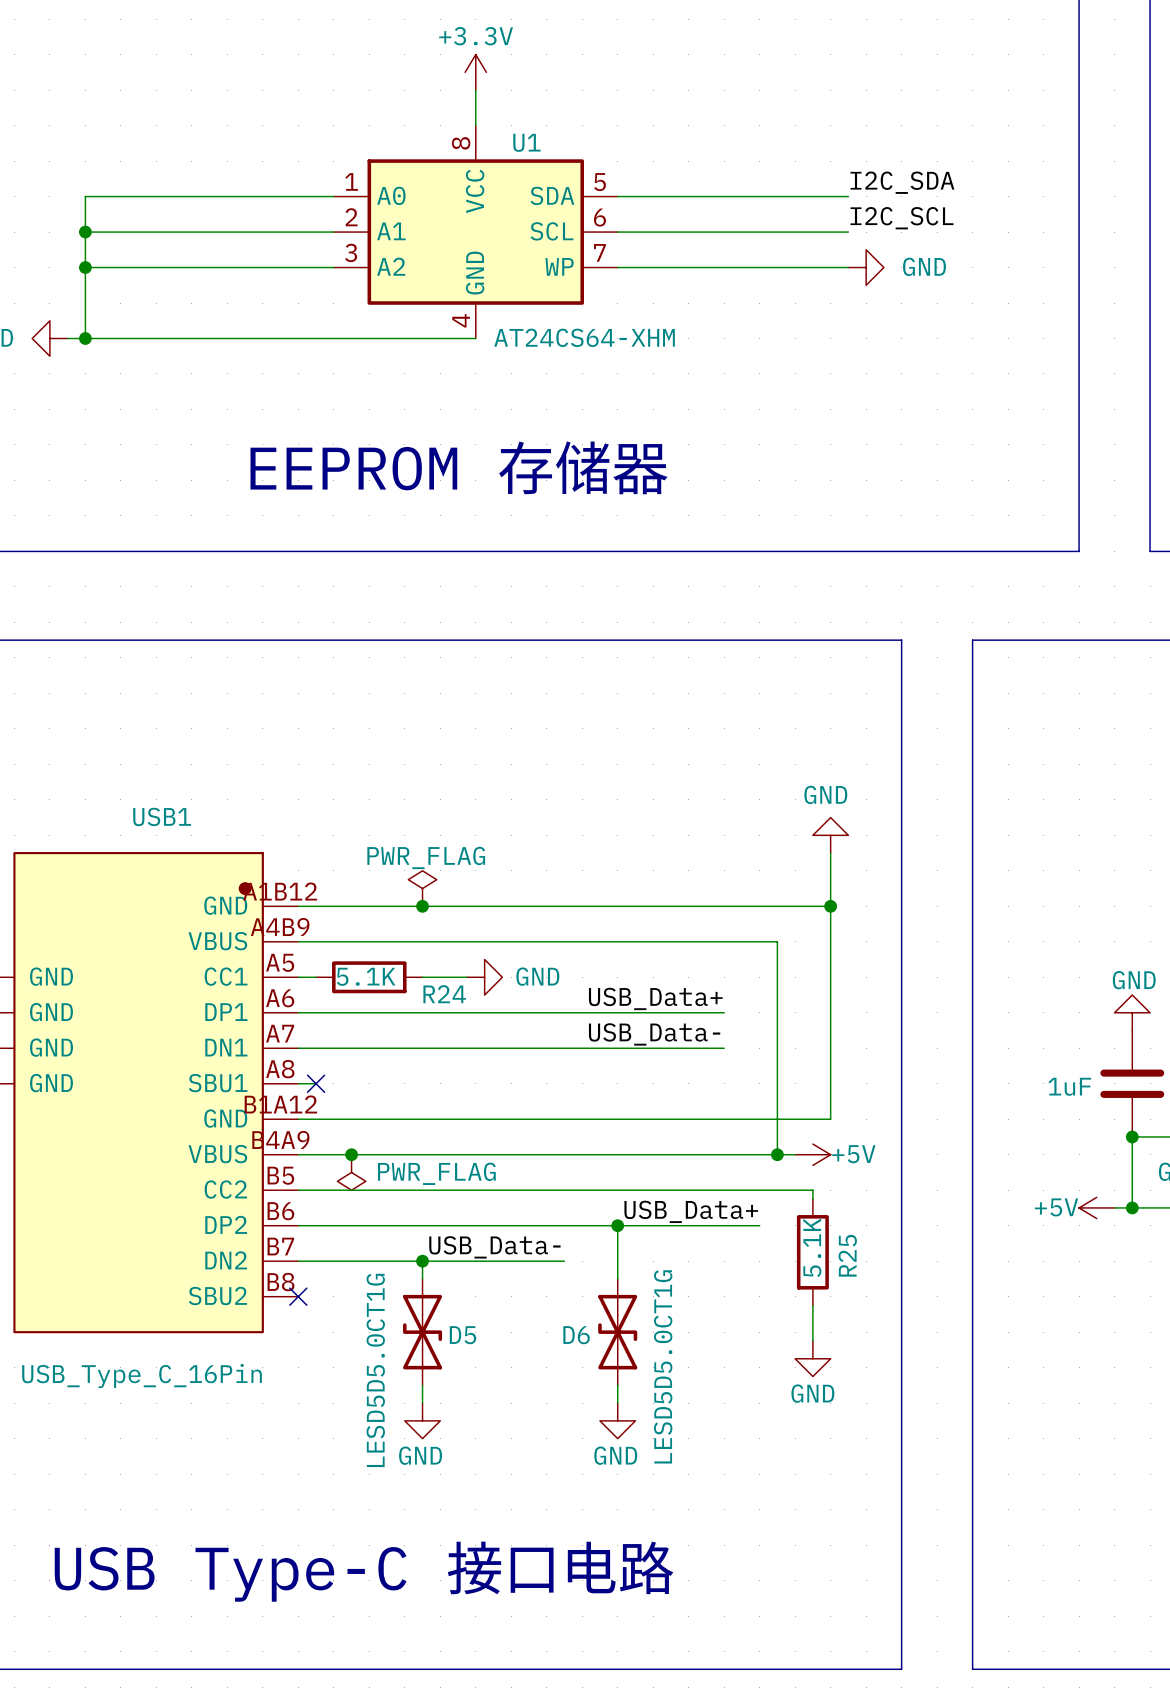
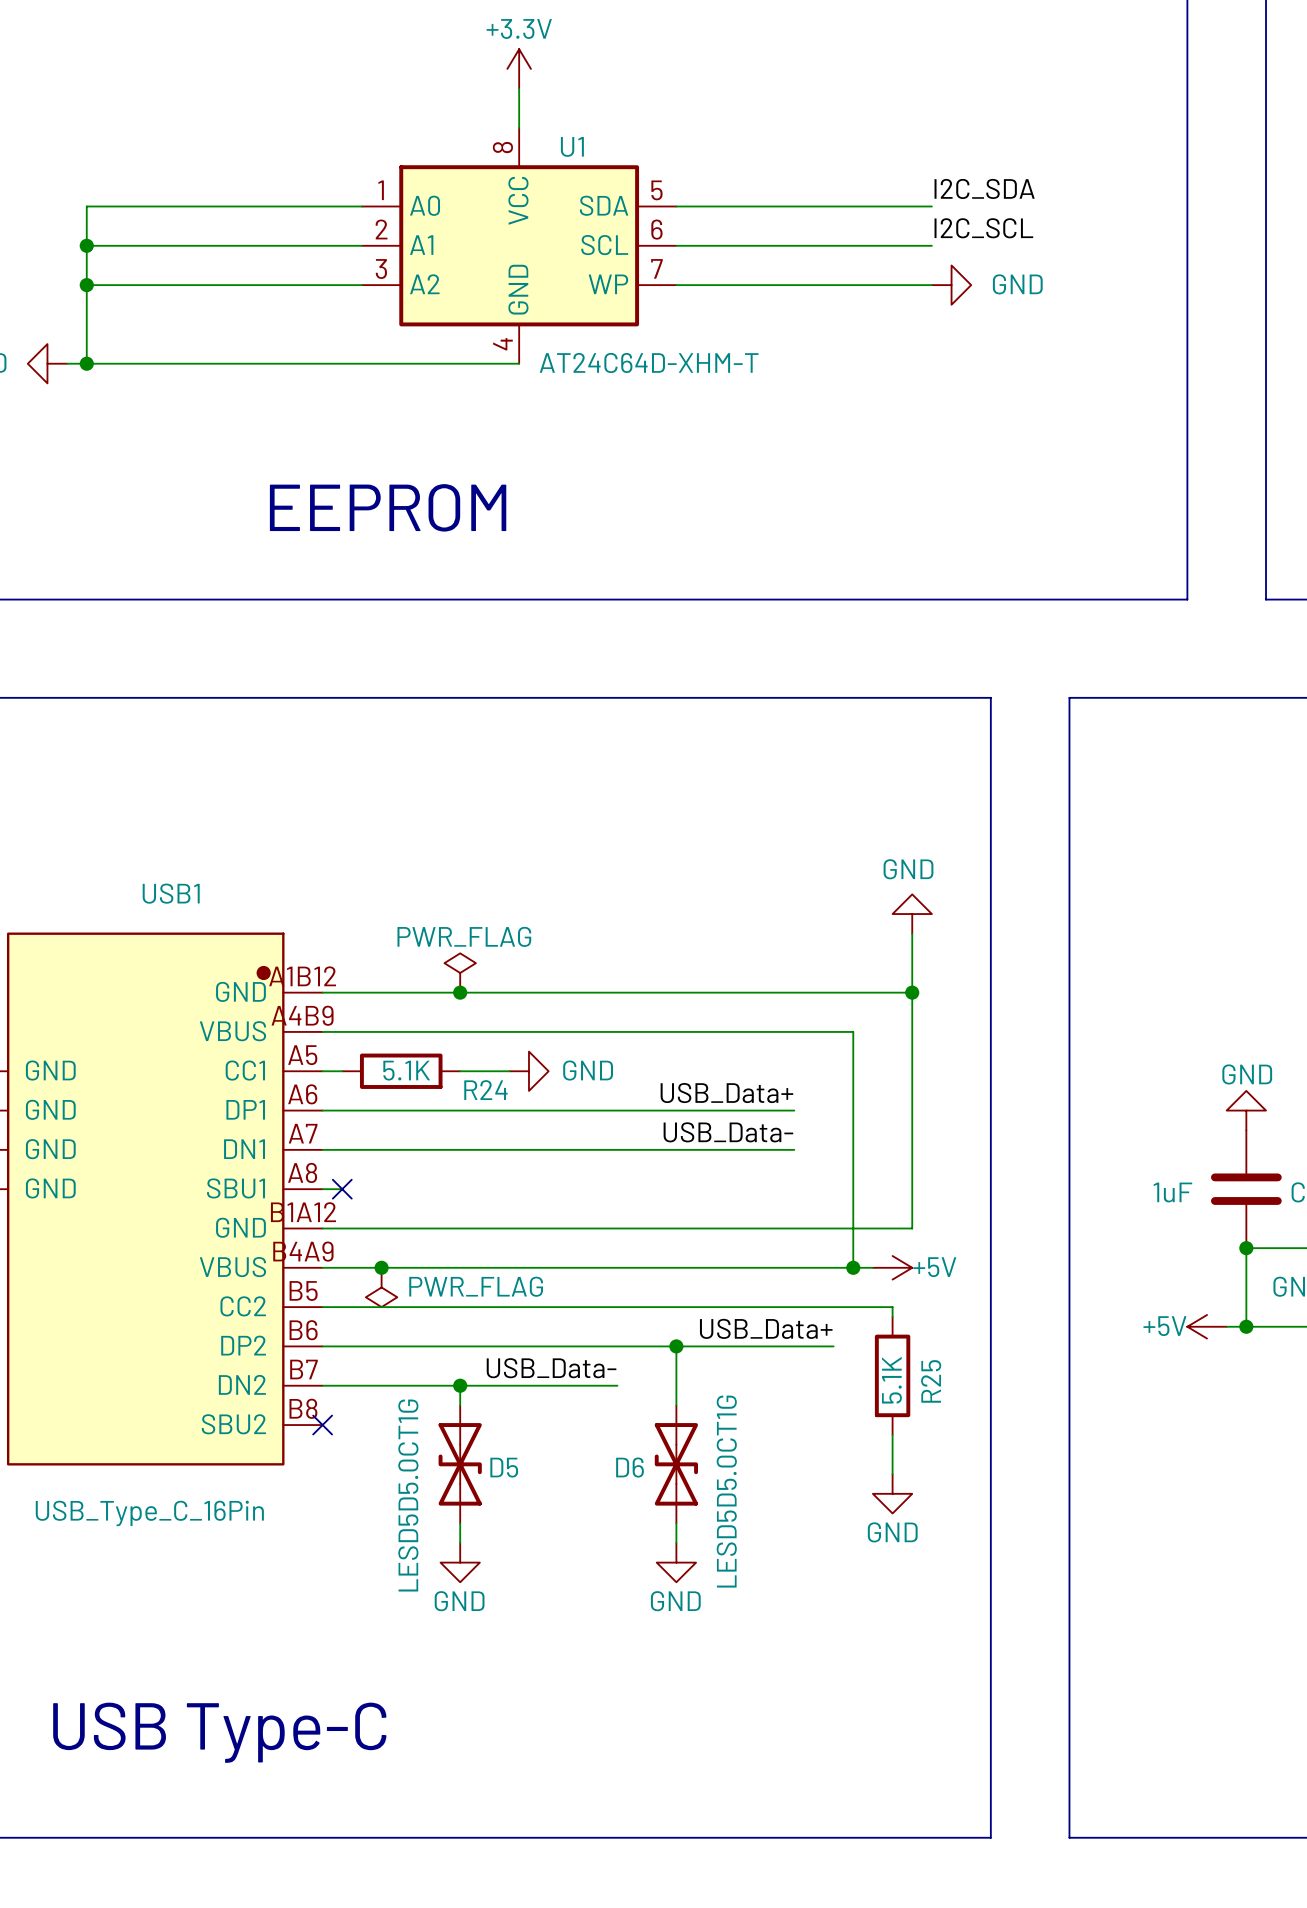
U1 value: AT24CS64-XHM (584, 337) -> AT24C64D-XHM-T (649, 363)
text: EEPROM 存储器 (459, 467) -> EEPROM (388, 507)
text: USB Type-C 接口电路 (364, 1571) -> USB Type-C (219, 1732)

